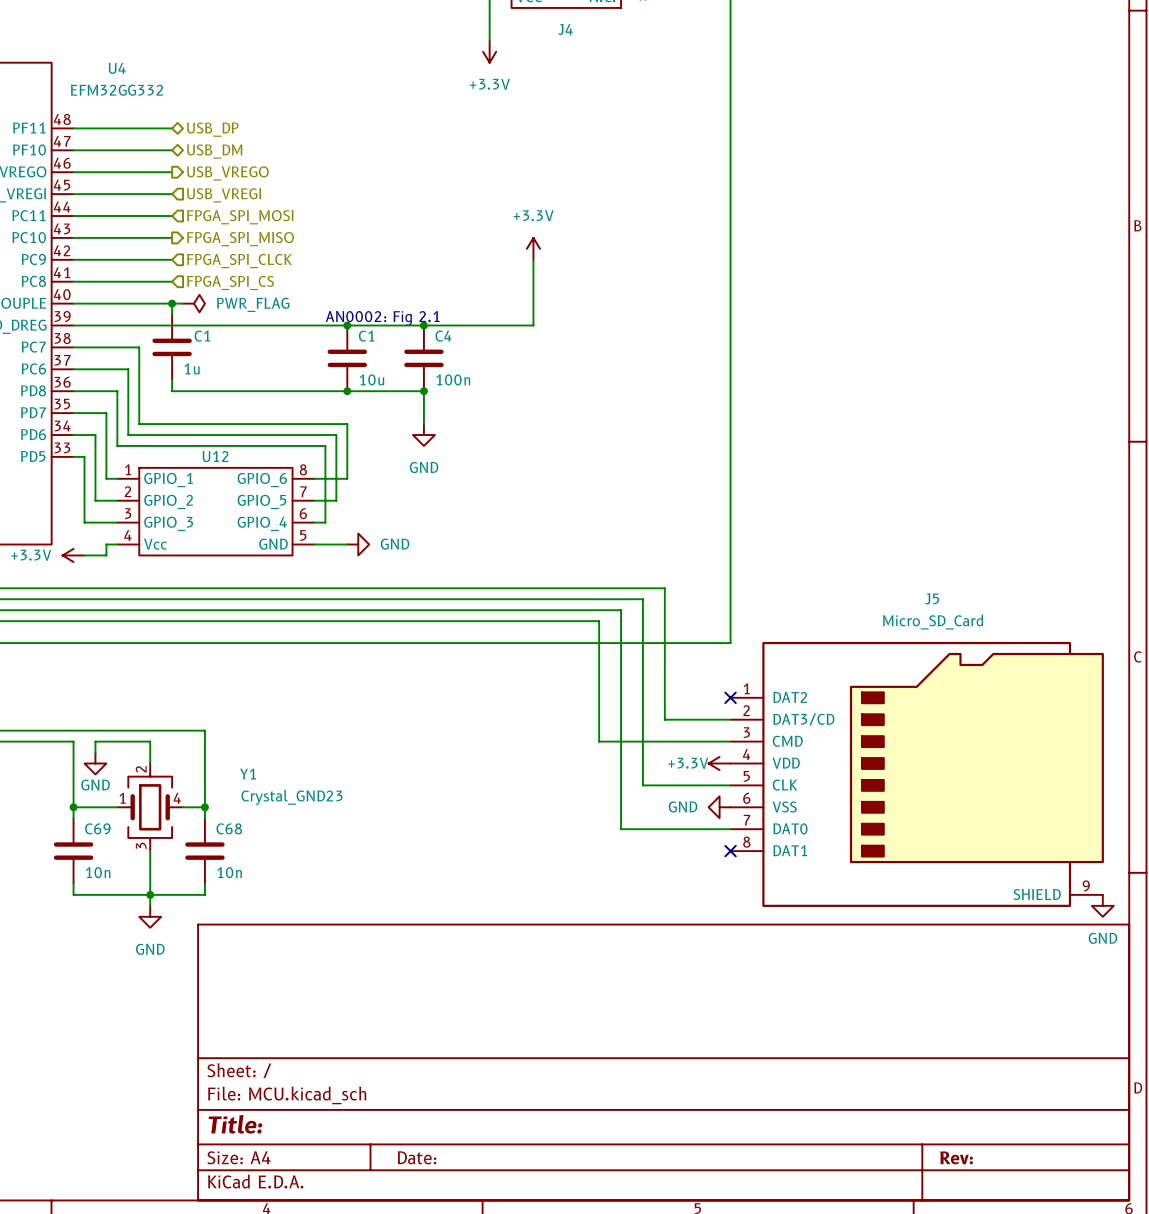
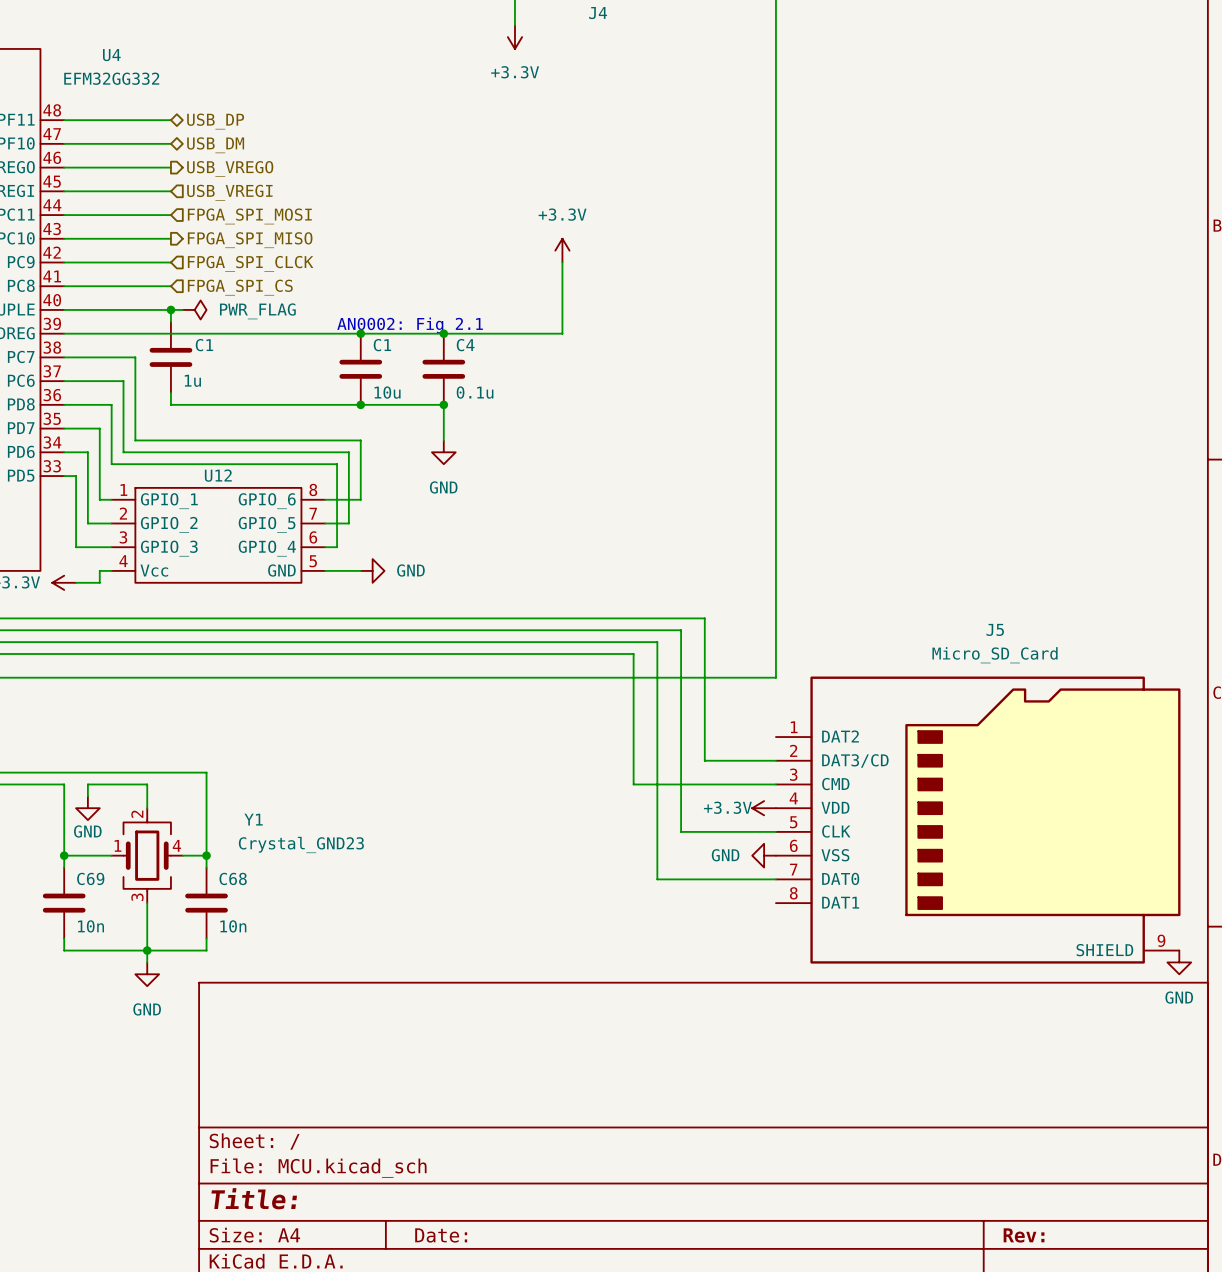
C4 value: 100n (453, 379) -> 0.1u (475, 392)
no-connect mark: (730, 697) -> none
no-connect mark: (730, 851) -> none

